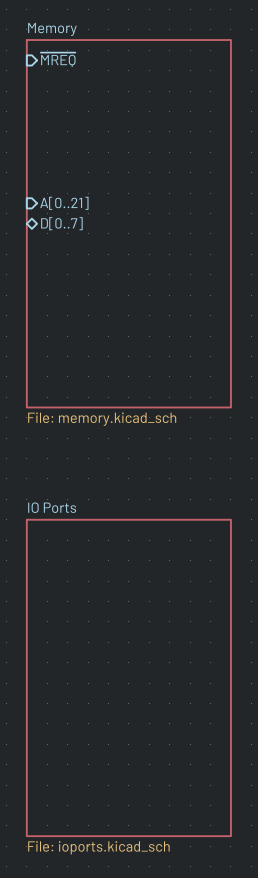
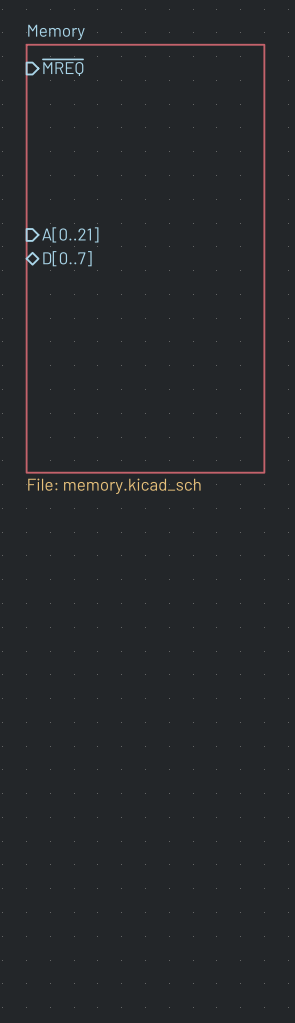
sheet IO Ports: File: ioports.kicad_sch (128, 677) -> none

